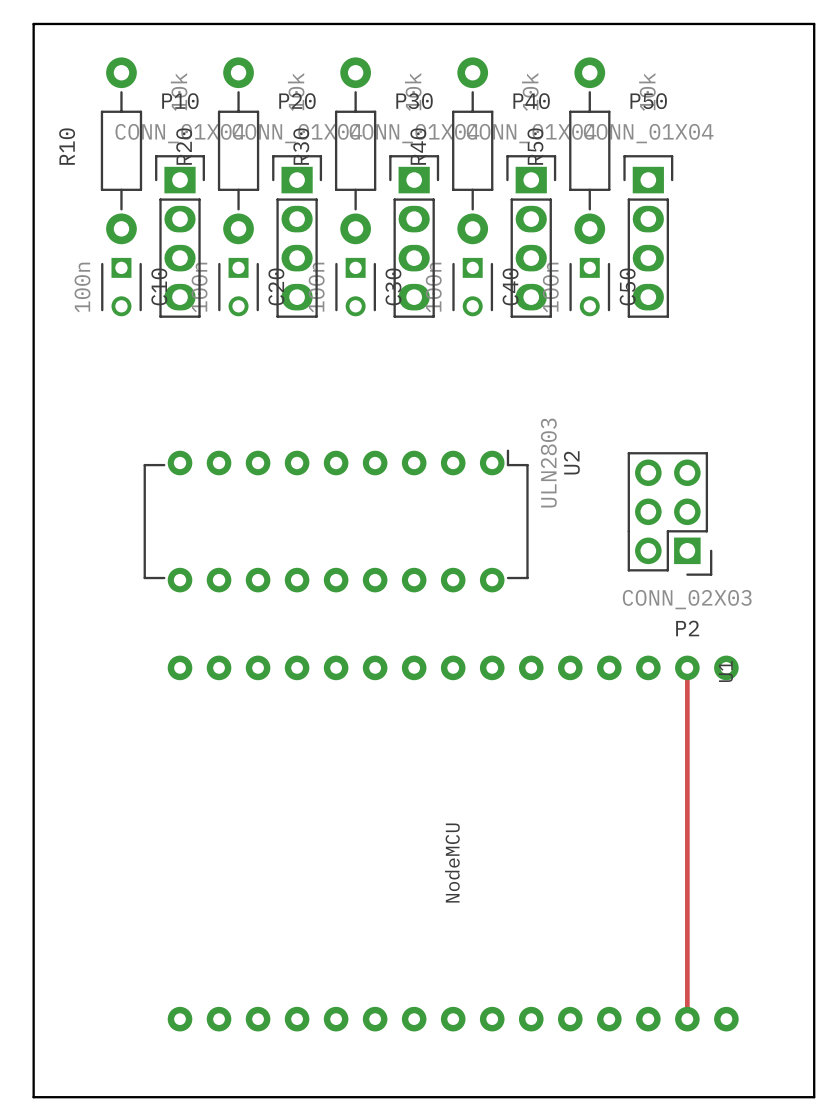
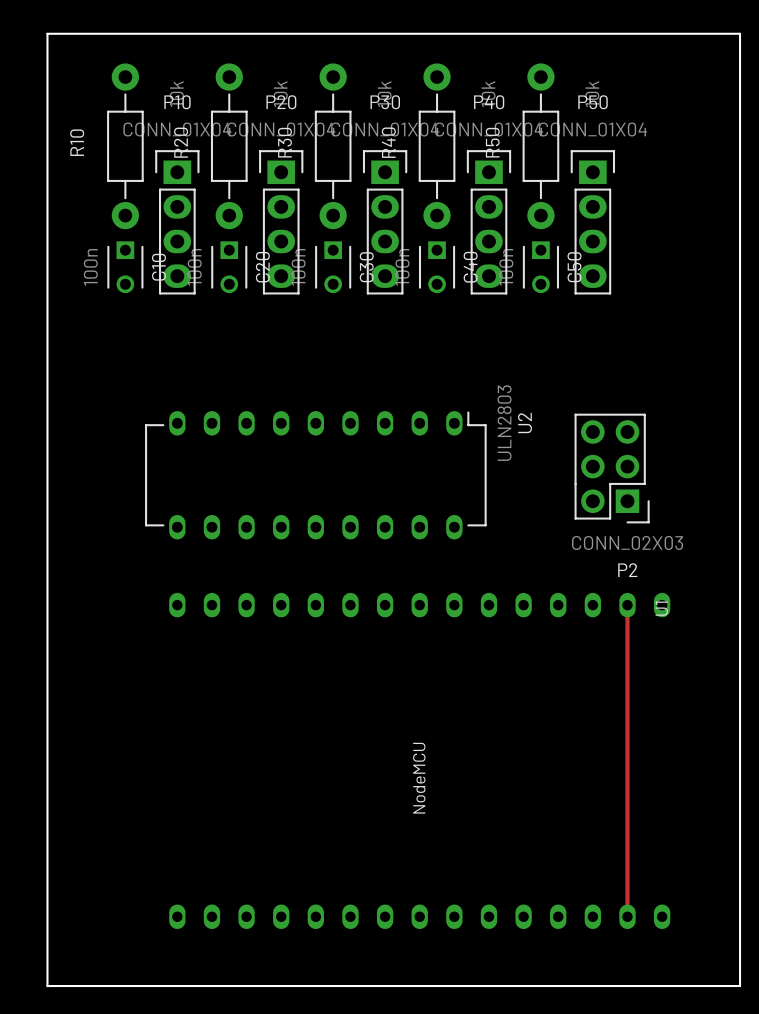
U2 footprint: [143, 449, 529, 593] -> [145, 411, 487, 540]
U1 footprint: [167, 655, 739, 1032] -> [169, 592, 671, 930]

